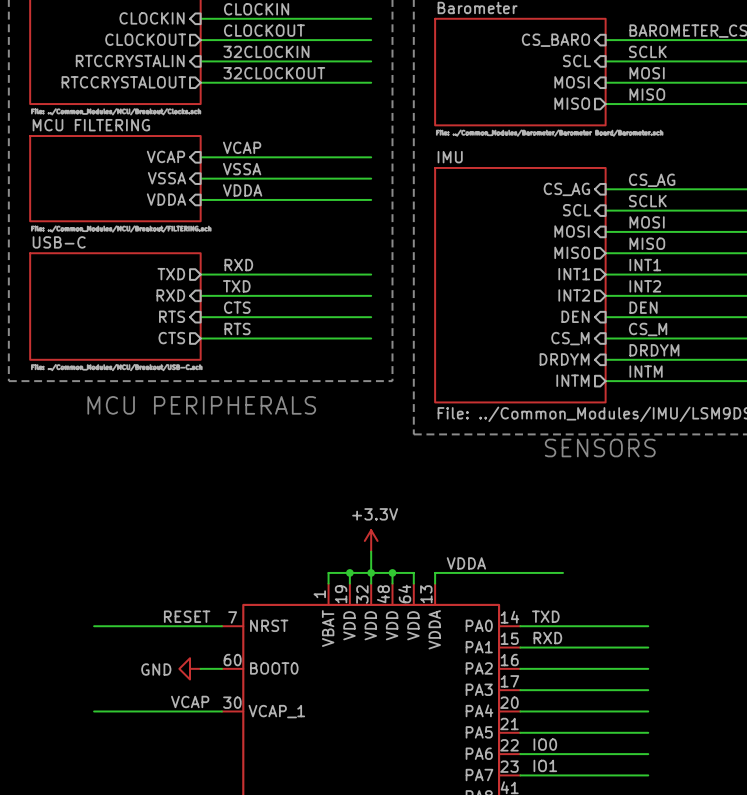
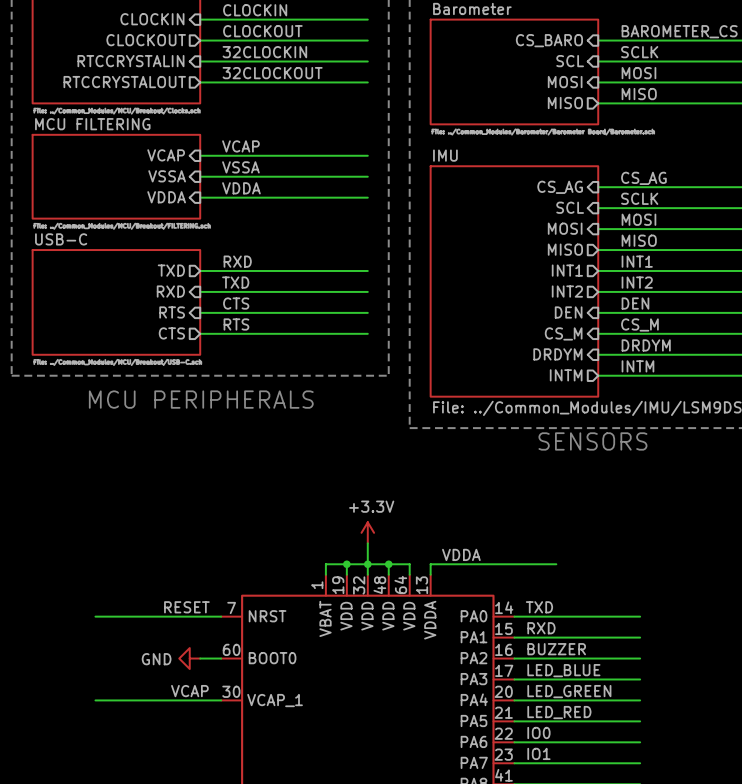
label: none -> BUZZER (556, 649)
label: none -> LED_BLUE (563, 670)
label: none -> LED_GREEN (569, 691)
label: none -> LED_RED (559, 712)

